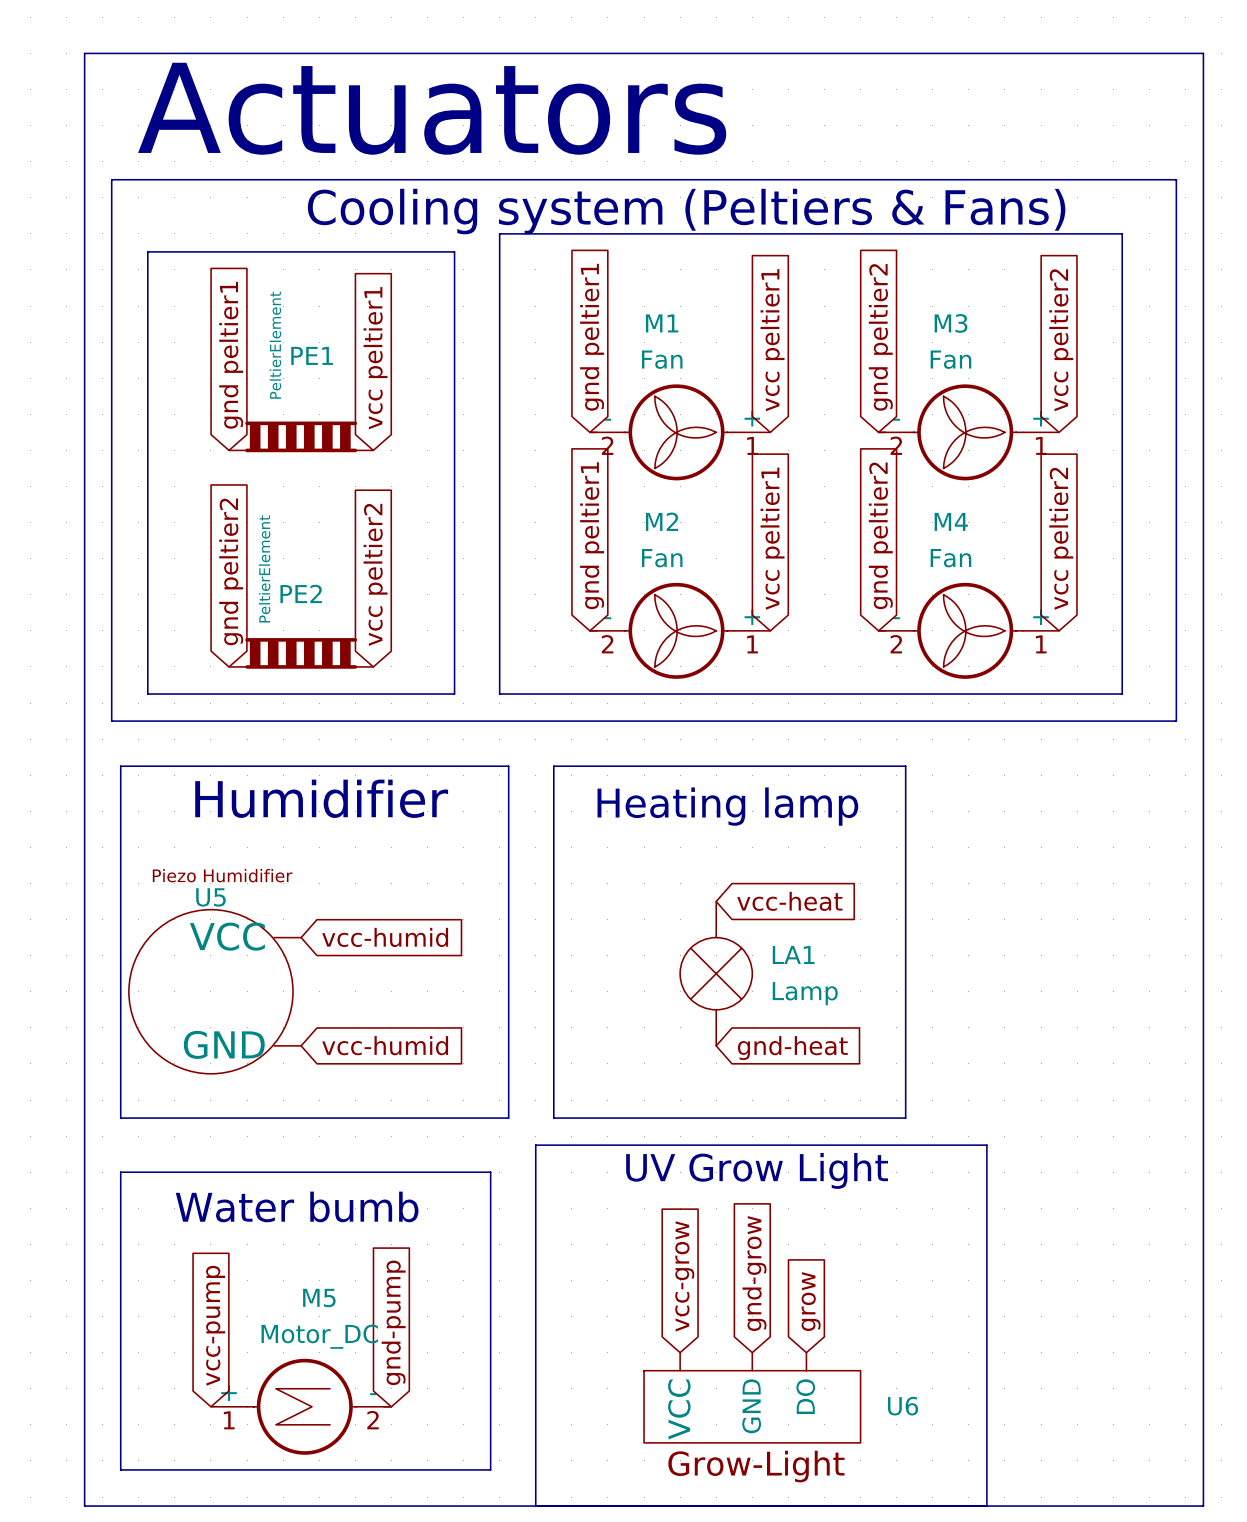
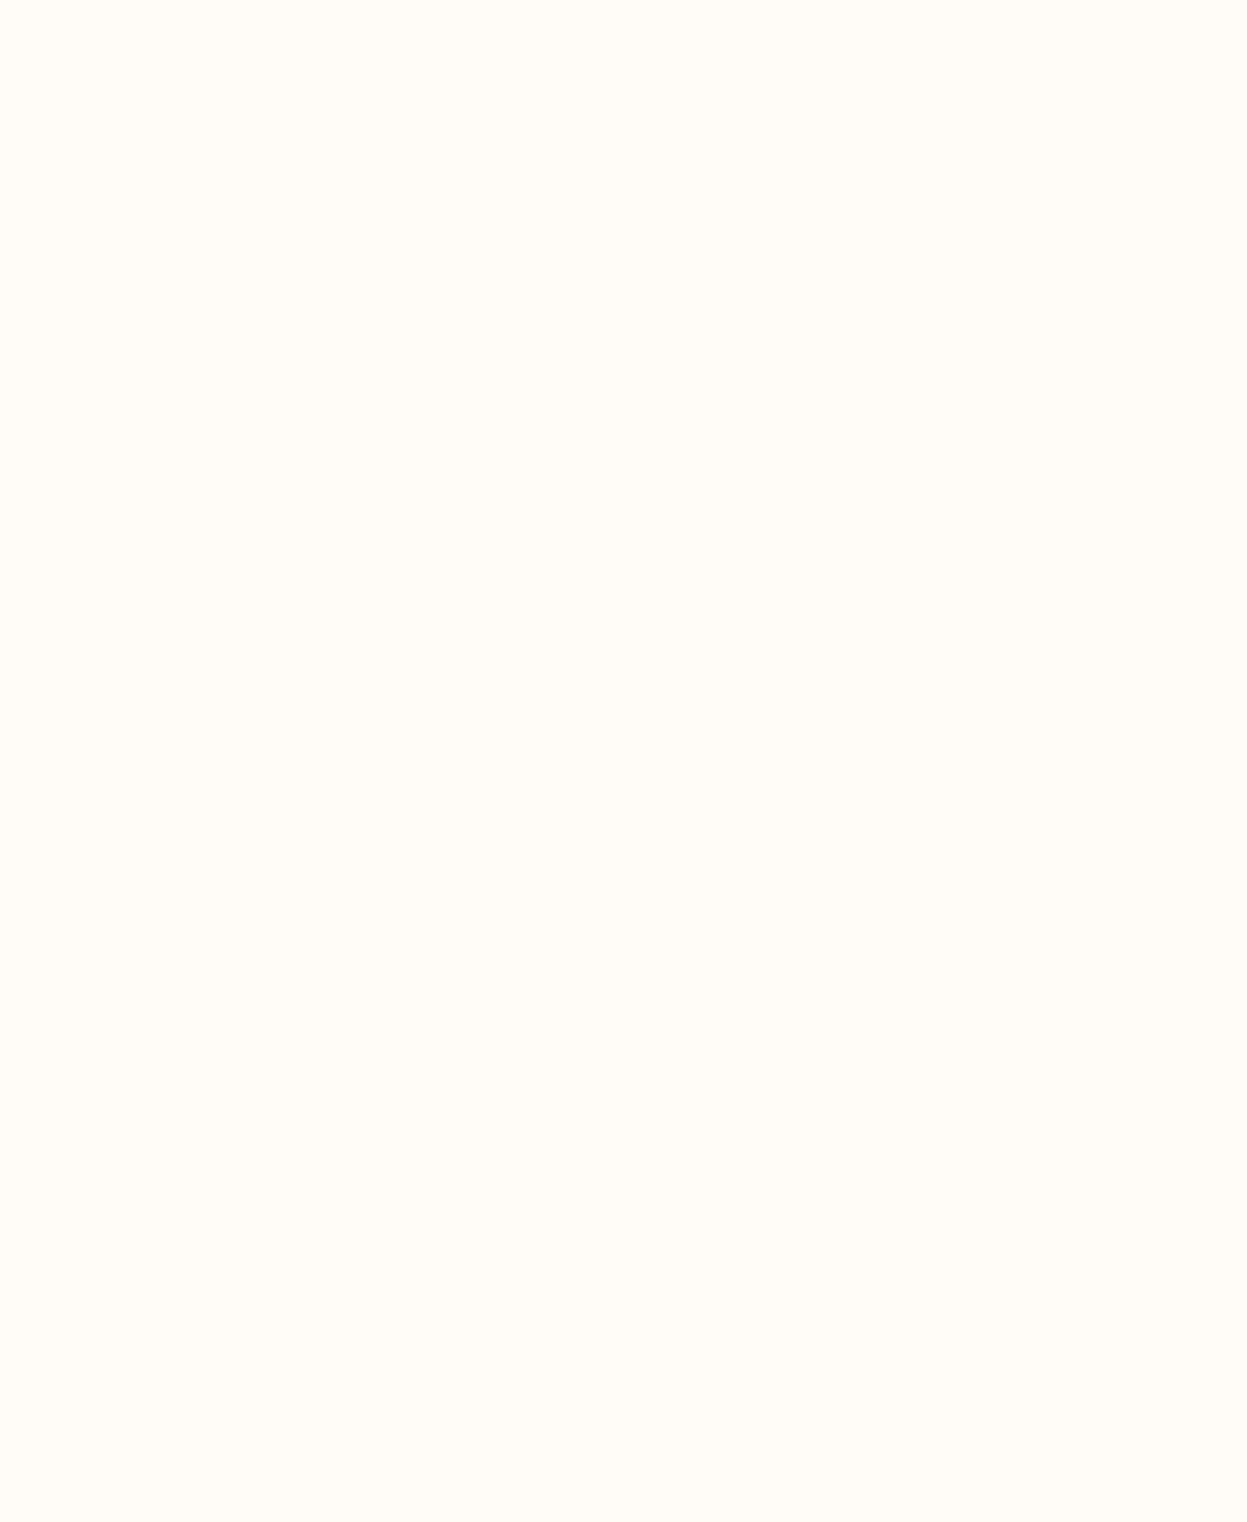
line: (84, 53) (1203, 53) (1203, 1506) (84, 1506) (84, 53) -> none
text: Actuators (432, 108) -> none
line: (111, 179) (1176, 179) (1176, 721) (111, 721) (111, 179) -> none
text: Cooling system (Peltiers & Fans) (686, 211) -> none
line: (499, 233) (1122, 233) (1122, 694) (499, 694) (499, 233) -> none
line: (147, 251) (454, 251) (454, 694) (147, 694) (147, 251) -> none
global label: gnd peltier1 (592, 337) -> none
global label: gnd peltier2 (880, 337) -> none
global label: vcc peltier1 (772, 340) -> none
global label: vcc peltier2 (1061, 340) -> none
global label: gnd peltier1 (231, 355) -> none
global label: vcc peltier1 (375, 358) -> none
M1: Fan (680, 432) -> none
M3: Fan (968, 432) -> none
PE1: PeltierElement (301, 436) -> none
global label: gnd peltier1 (592, 535) -> none
global label: gnd peltier2 (880, 535) -> none
global label: vcc peltier1 (772, 538) -> none
global label: vcc peltier2 (1061, 538) -> none
global label: gnd peltier2 (231, 571) -> none
global label: vcc peltier2 (375, 574) -> none
M2: Fan (680, 630) -> none
M4: Fan (968, 630) -> none
PE2: PeltierElement (301, 653) -> none
line: (120, 766) (508, 766) (508, 1118) (120, 1118) (120, 766) -> none
line: (553, 766) (905, 766) (905, 1118) (553, 1118) (553, 766) -> none
text: Humidifier (321, 798) -> none
text: Heating lamp (727, 806) -> none
global label: vcc-heat (789, 901) -> none
global label: vcc-humid (385, 937) -> none
LA1: Lamp (716, 973) -> none
U5: (215, 991) -> none
global label: vcc-humid (385, 1045) -> none
global label: gnd-heat (792, 1048) -> none
text: UV Grow Light (757, 1170) -> none
line: (120, 1172) (120, 1469) (490, 1469) (490, 1172) (120, 1172) -> none
text: Water bumb (297, 1206) -> none
global label: gnd-grow (754, 1273) -> none
global label: vcc-grow (684, 1276) -> none
global label: grow (811, 1301) -> none
global label: gnd-pump (393, 1322) -> none
global label: vcc-pump (215, 1325) -> none
U6: (752, 1397) -> none
M5: Motor_DC (301, 1406) -> none
line: (535, 1506) (535, 1145) (986, 1145) (986, 1506) -> none

